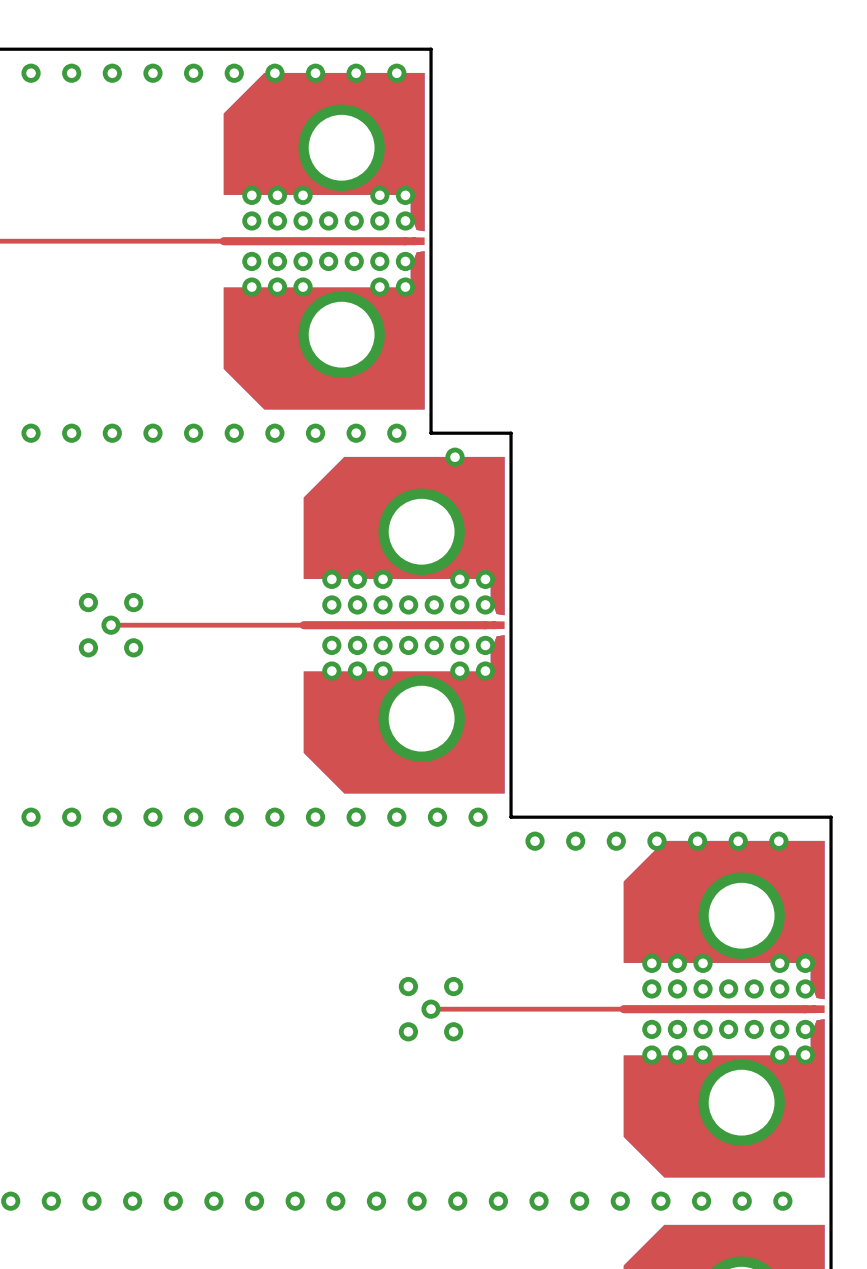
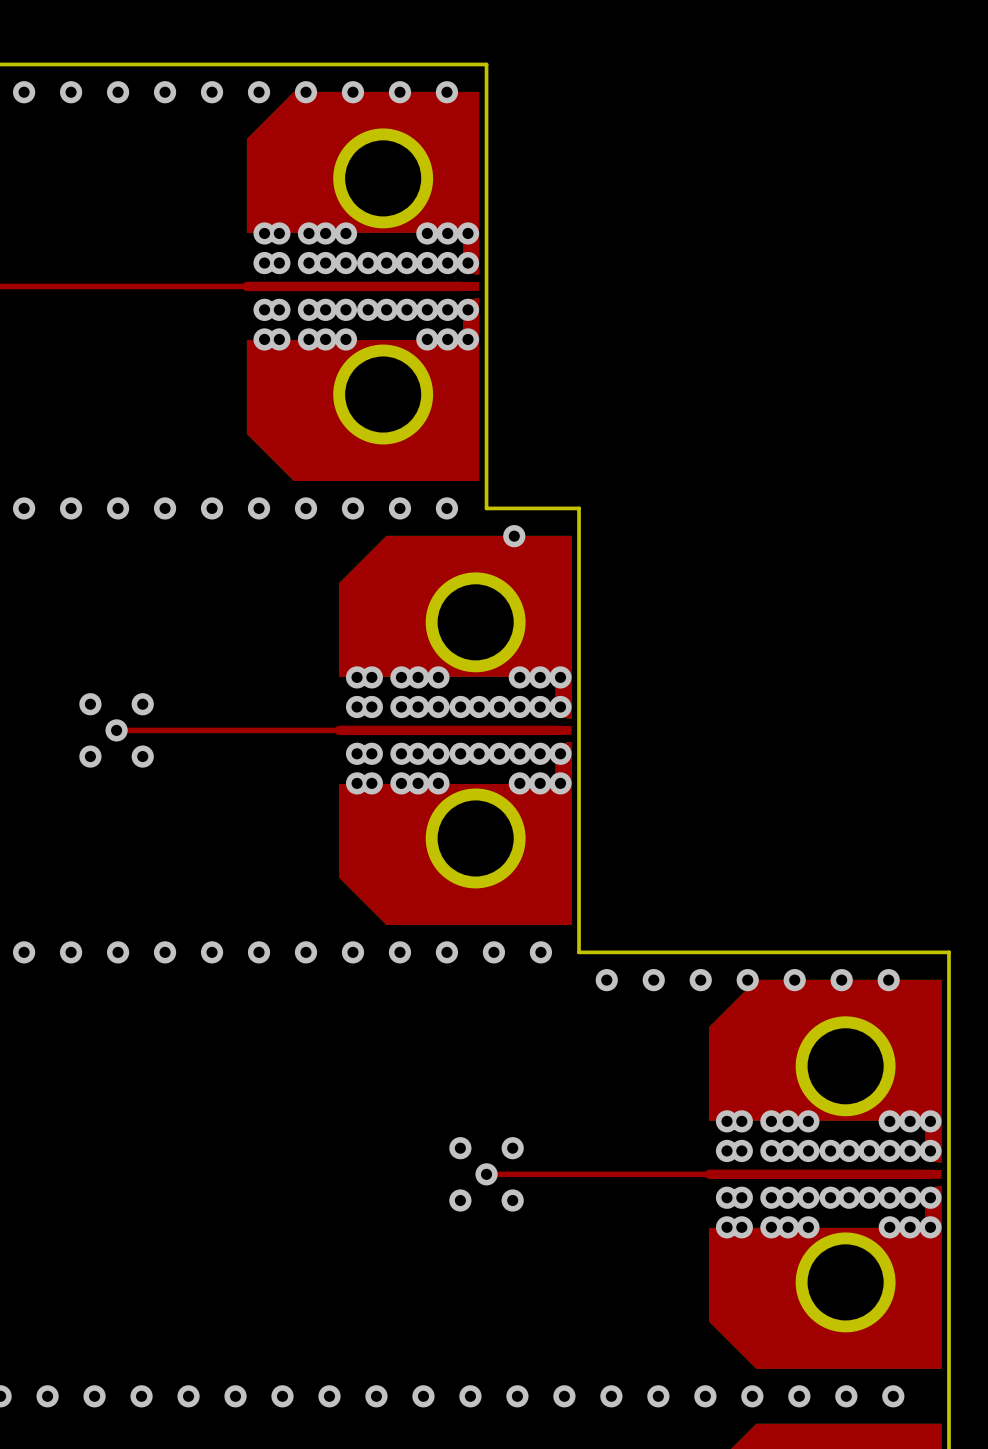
via: none -> (264, 233)
via: none -> (325, 233)
via: (303, 195) -> none
via: none -> (345, 233)
via: none -> (447, 233)
via: (405, 195) -> none
via: none -> (468, 233)
via: none -> (264, 263)
via: none -> (325, 263)
via: (303, 220) -> none
via: none -> (345, 263)
via: none -> (386, 263)
via: (354, 220) -> none
via: none -> (407, 263)
via: none -> (447, 263)
via: (405, 220) -> none
via: none -> (468, 263)
via: none -> (264, 309)
via: none -> (325, 309)
via: (303, 261) -> none
via: none -> (345, 309)
via: none -> (386, 309)
via: (354, 261) -> none
via: none -> (407, 309)
via: none -> (447, 309)
via: (405, 261) -> none
via: none -> (468, 309)
via: none -> (264, 339)
via: none -> (325, 339)
via: (303, 287) -> none
via: none -> (345, 339)
via: none -> (447, 339)
via: (405, 287) -> none
via: none -> (468, 339)
via: none -> (357, 677)
via: none -> (418, 677)
via: (383, 579) -> none
via: none -> (438, 677)
via: none -> (540, 677)
via: (485, 579) -> none
via: none -> (560, 677)
via: none -> (357, 707)
via: none -> (418, 707)
via: (383, 604) -> none
via: none -> (438, 707)
via: none -> (479, 707)
via: (434, 604) -> none
via: none -> (499, 707)
via: none -> (540, 707)
via: (485, 604) -> none
via: none -> (560, 707)
via: none -> (357, 753)
via: none -> (418, 753)
via: (383, 645) -> none
via: none -> (438, 753)
via: none -> (479, 753)
via: (434, 645) -> none
via: none -> (499, 753)
via: none -> (540, 753)
via: (485, 645) -> none
via: none -> (560, 753)
via: none -> (357, 783)
via: none -> (418, 783)
via: (383, 671) -> none
via: none -> (438, 783)
via: none -> (540, 783)
via: (485, 671) -> none
via: none -> (560, 783)
via: none -> (727, 1121)
via: none -> (788, 1121)
via: (703, 963) -> none
via: none -> (808, 1121)
via: none -> (910, 1121)
via: (805, 963) -> none
via: none -> (930, 1121)
via: none -> (727, 1150)
via: none -> (788, 1150)
via: (703, 988) -> none
via: none -> (808, 1150)
via: none -> (849, 1150)
via: (754, 988) -> none
via: none -> (869, 1150)
via: none -> (910, 1150)
via: (805, 988) -> none
via: none -> (930, 1150)
via: none -> (727, 1197)
via: none -> (788, 1197)
via: (703, 1029) -> none
via: none -> (808, 1197)
via: none -> (849, 1197)
via: (754, 1029) -> none
via: none -> (869, 1197)
via: none -> (910, 1197)
via: (805, 1029) -> none
via: none -> (930, 1197)
via: none -> (727, 1227)
via: none -> (788, 1227)
via: (703, 1055) -> none
via: none -> (808, 1227)
via: none -> (910, 1227)
via: (805, 1055) -> none
via: none -> (930, 1227)

